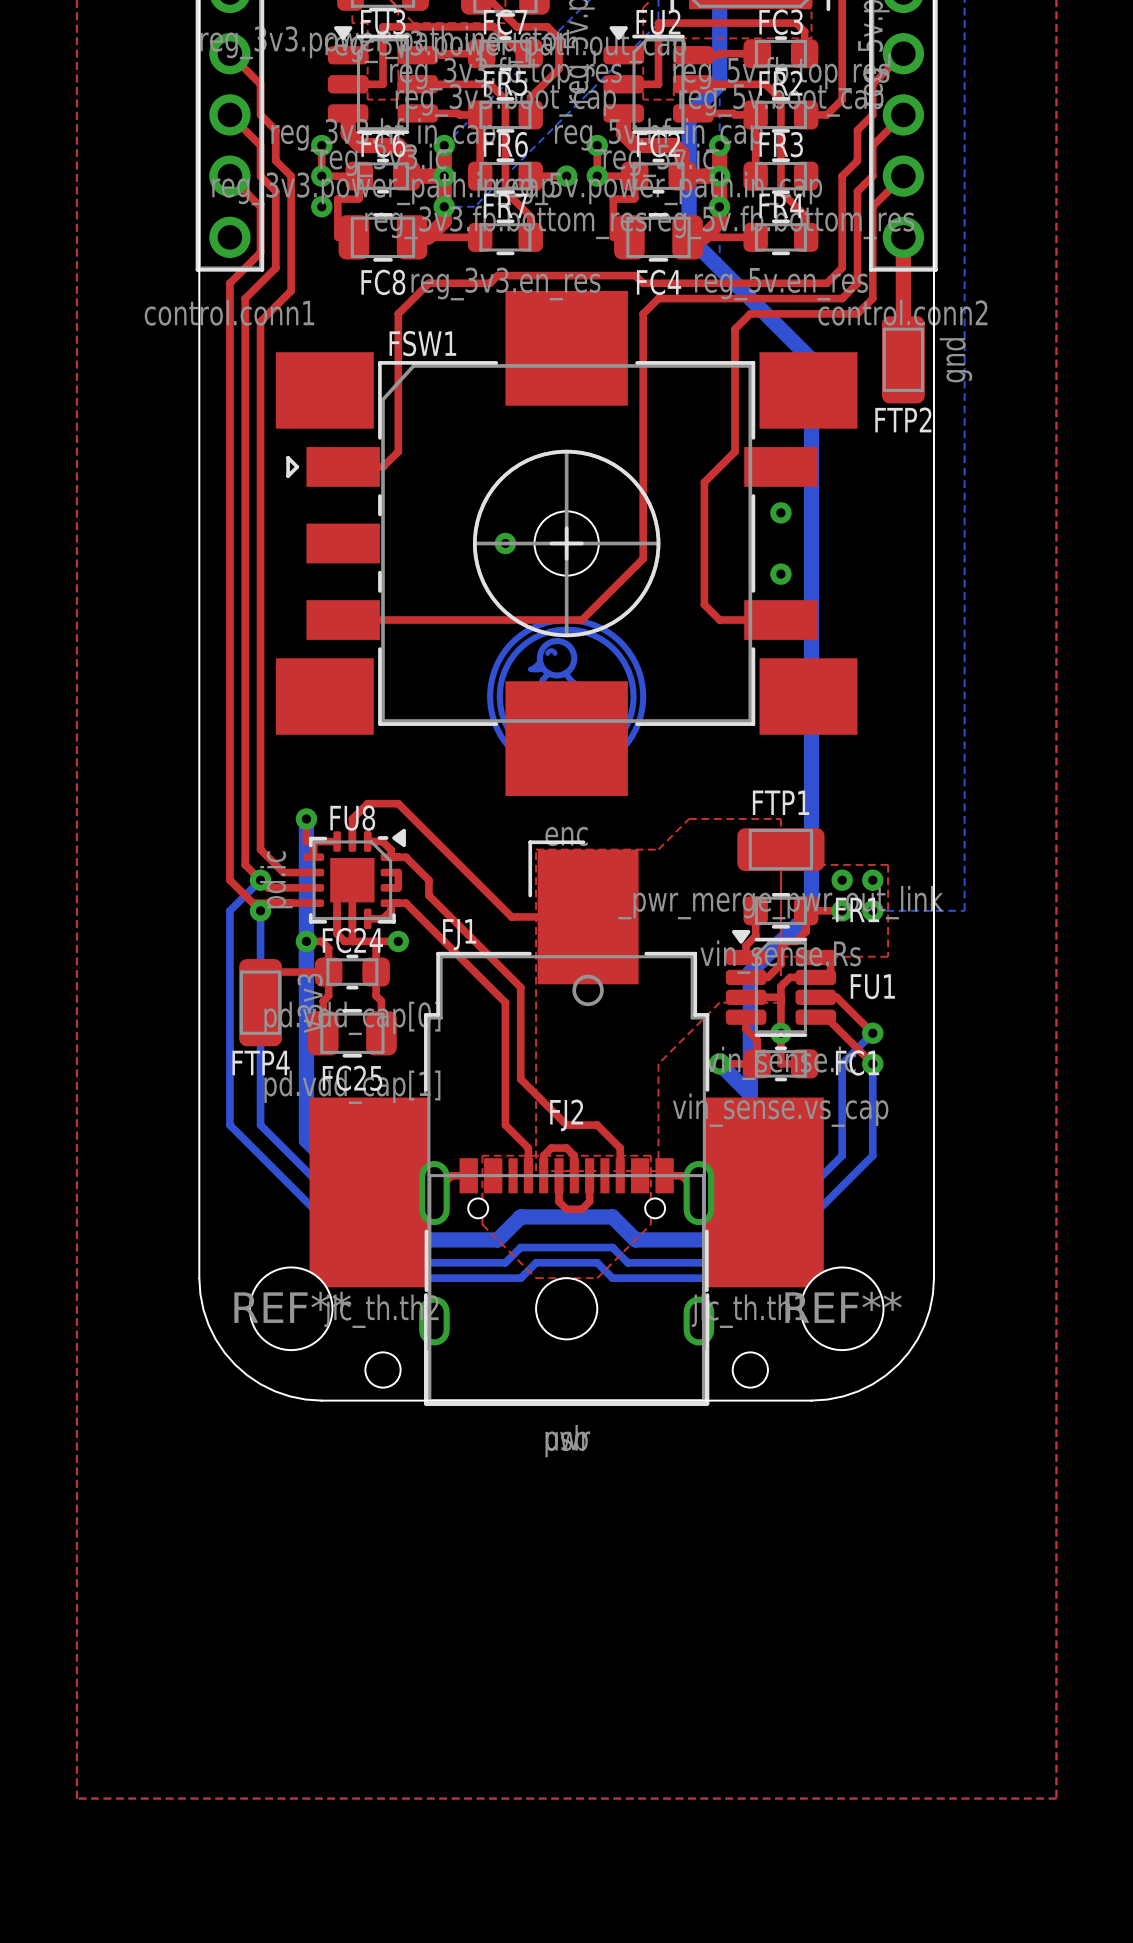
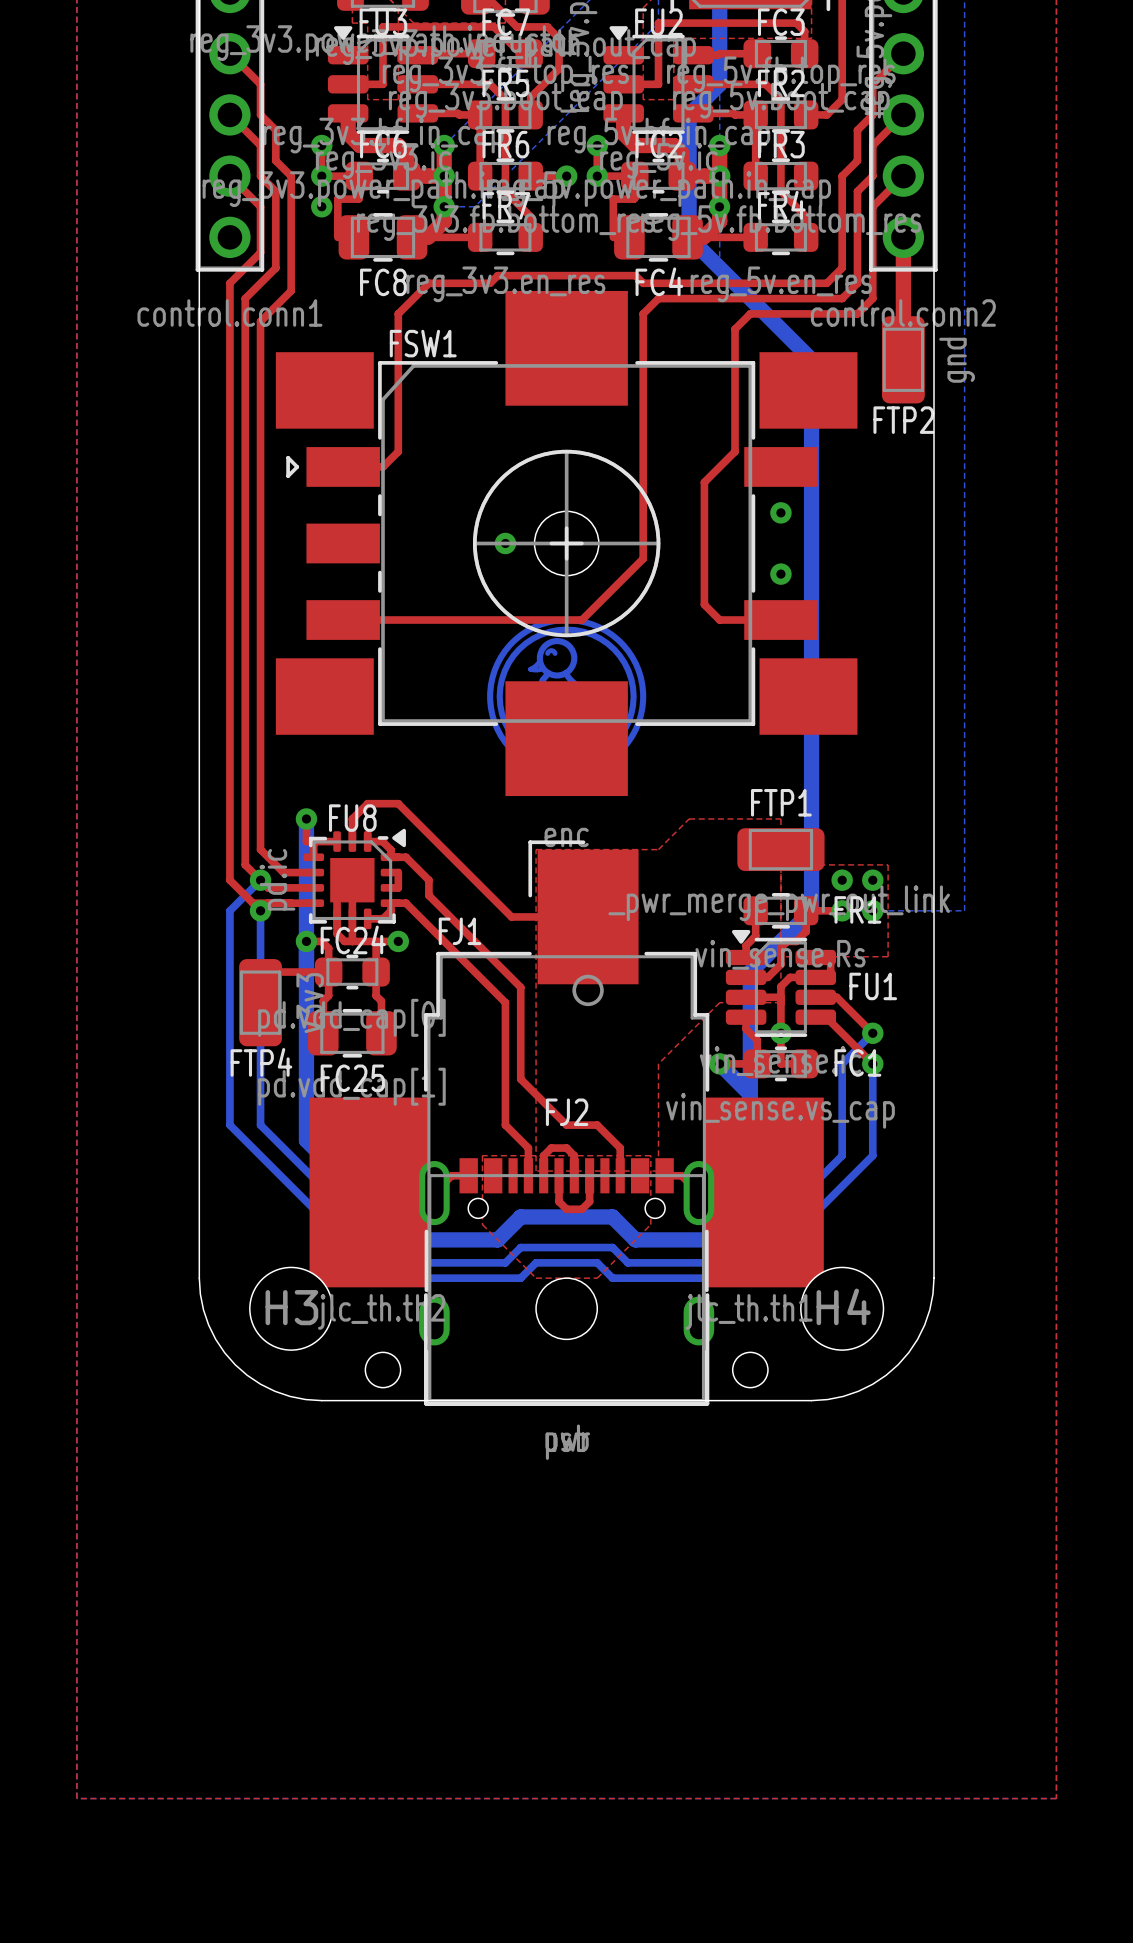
REF** name: REF** (292, 1307) -> H3 (291, 1307)
REF** name: REF** (843, 1307) -> H4 (843, 1306)

